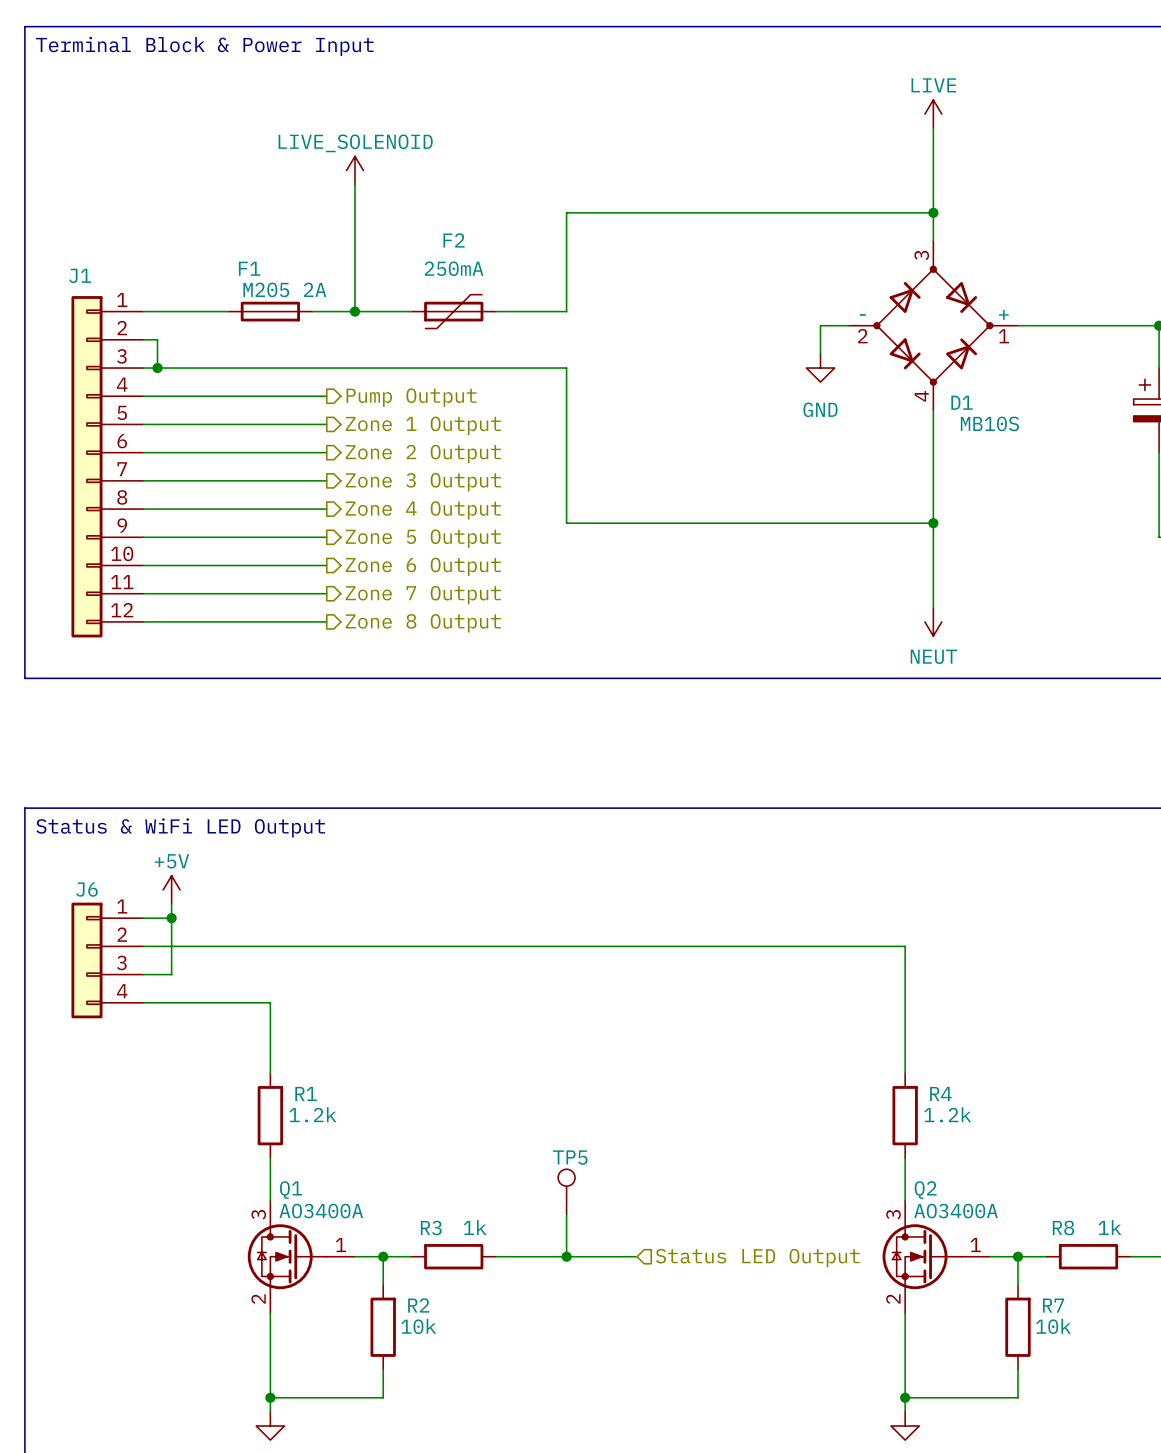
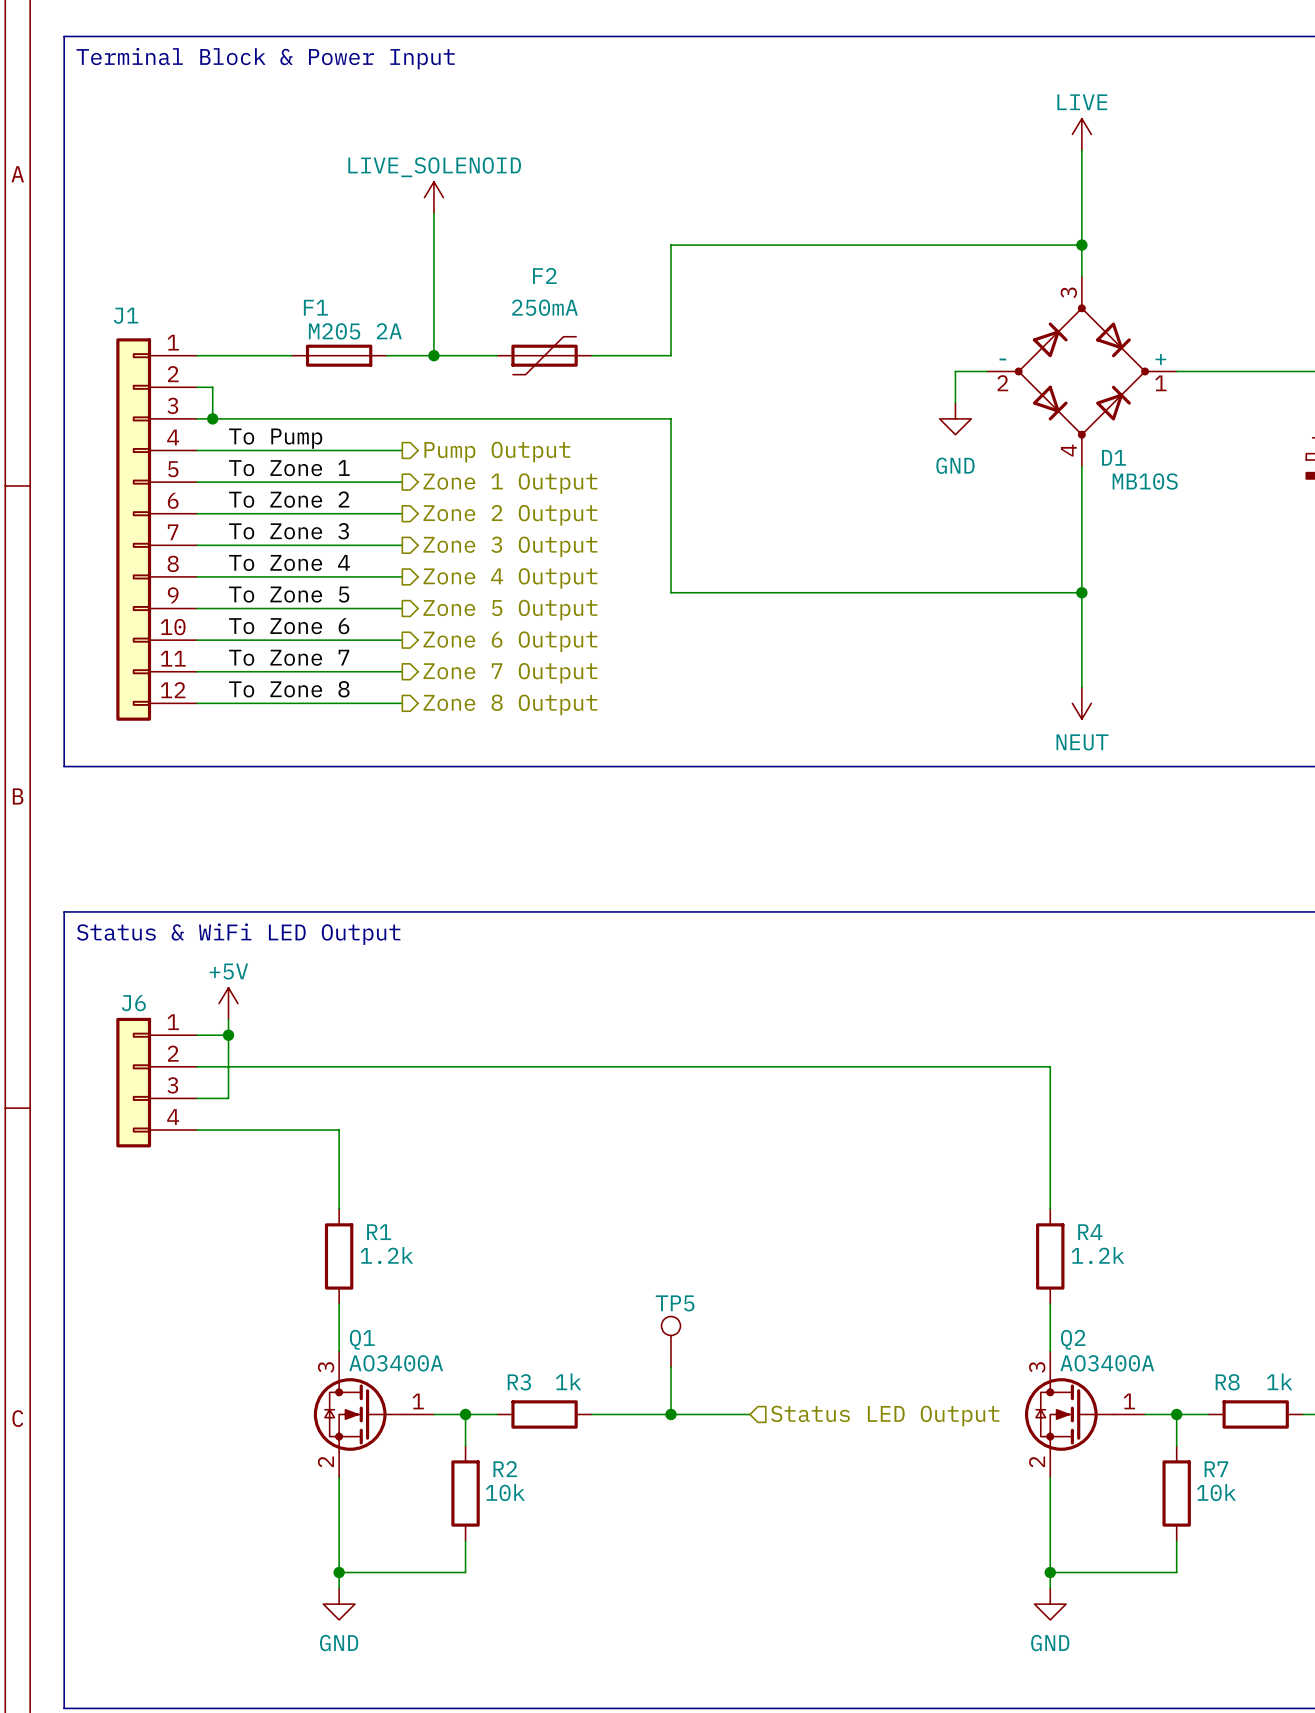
label: none -> To Pump (275, 438)
label: none -> To Zone 1 (289, 468)
label: none -> To Zone 2 (289, 499)
label: none -> To Zone 3 (288, 531)
label: none -> To Zone 4 (289, 562)
label: none -> To Zone 5 (289, 594)
label: none -> To Zone 6 (289, 626)
label: none -> To Zone 7 (289, 657)
label: none -> To Zone 8 (289, 689)

